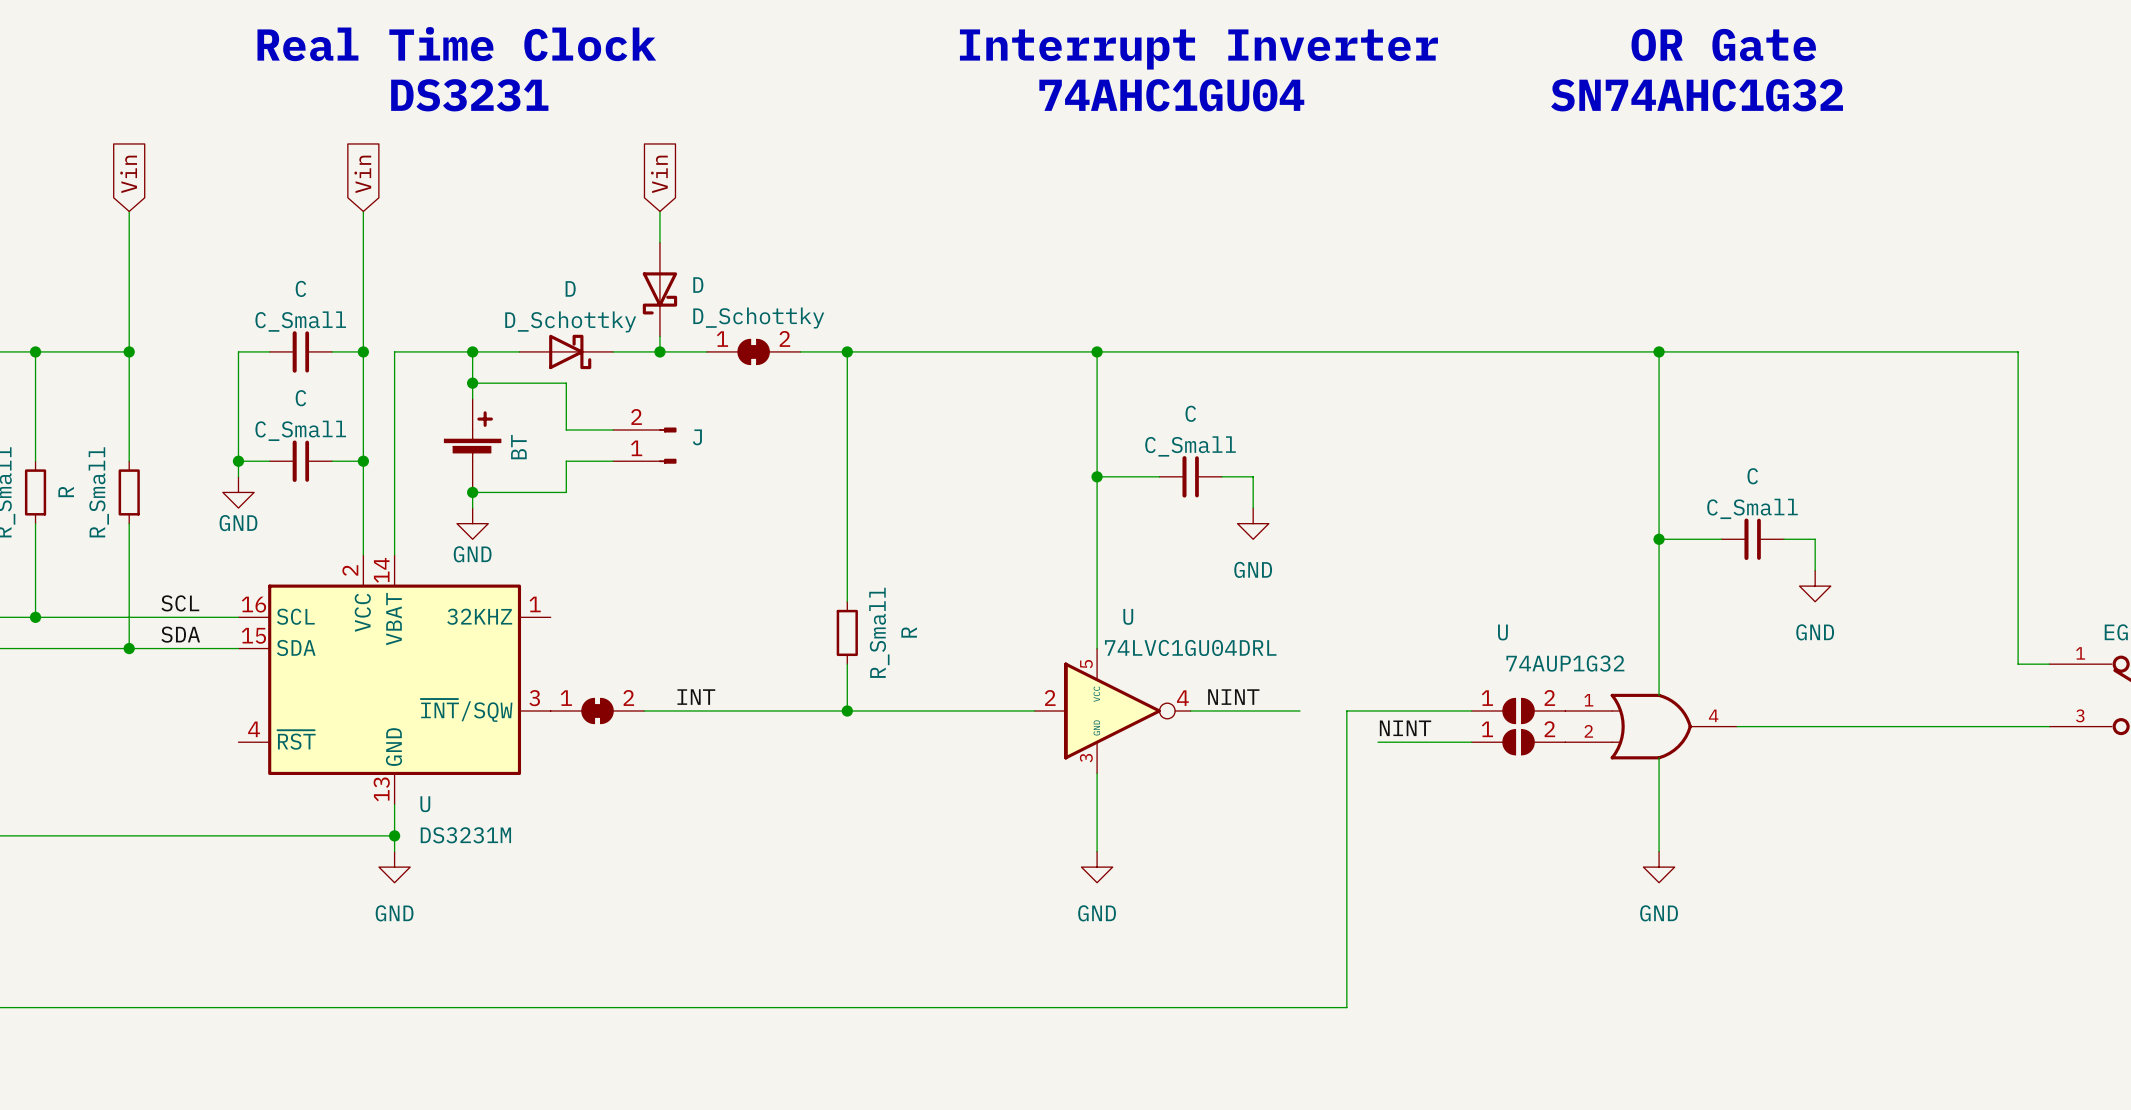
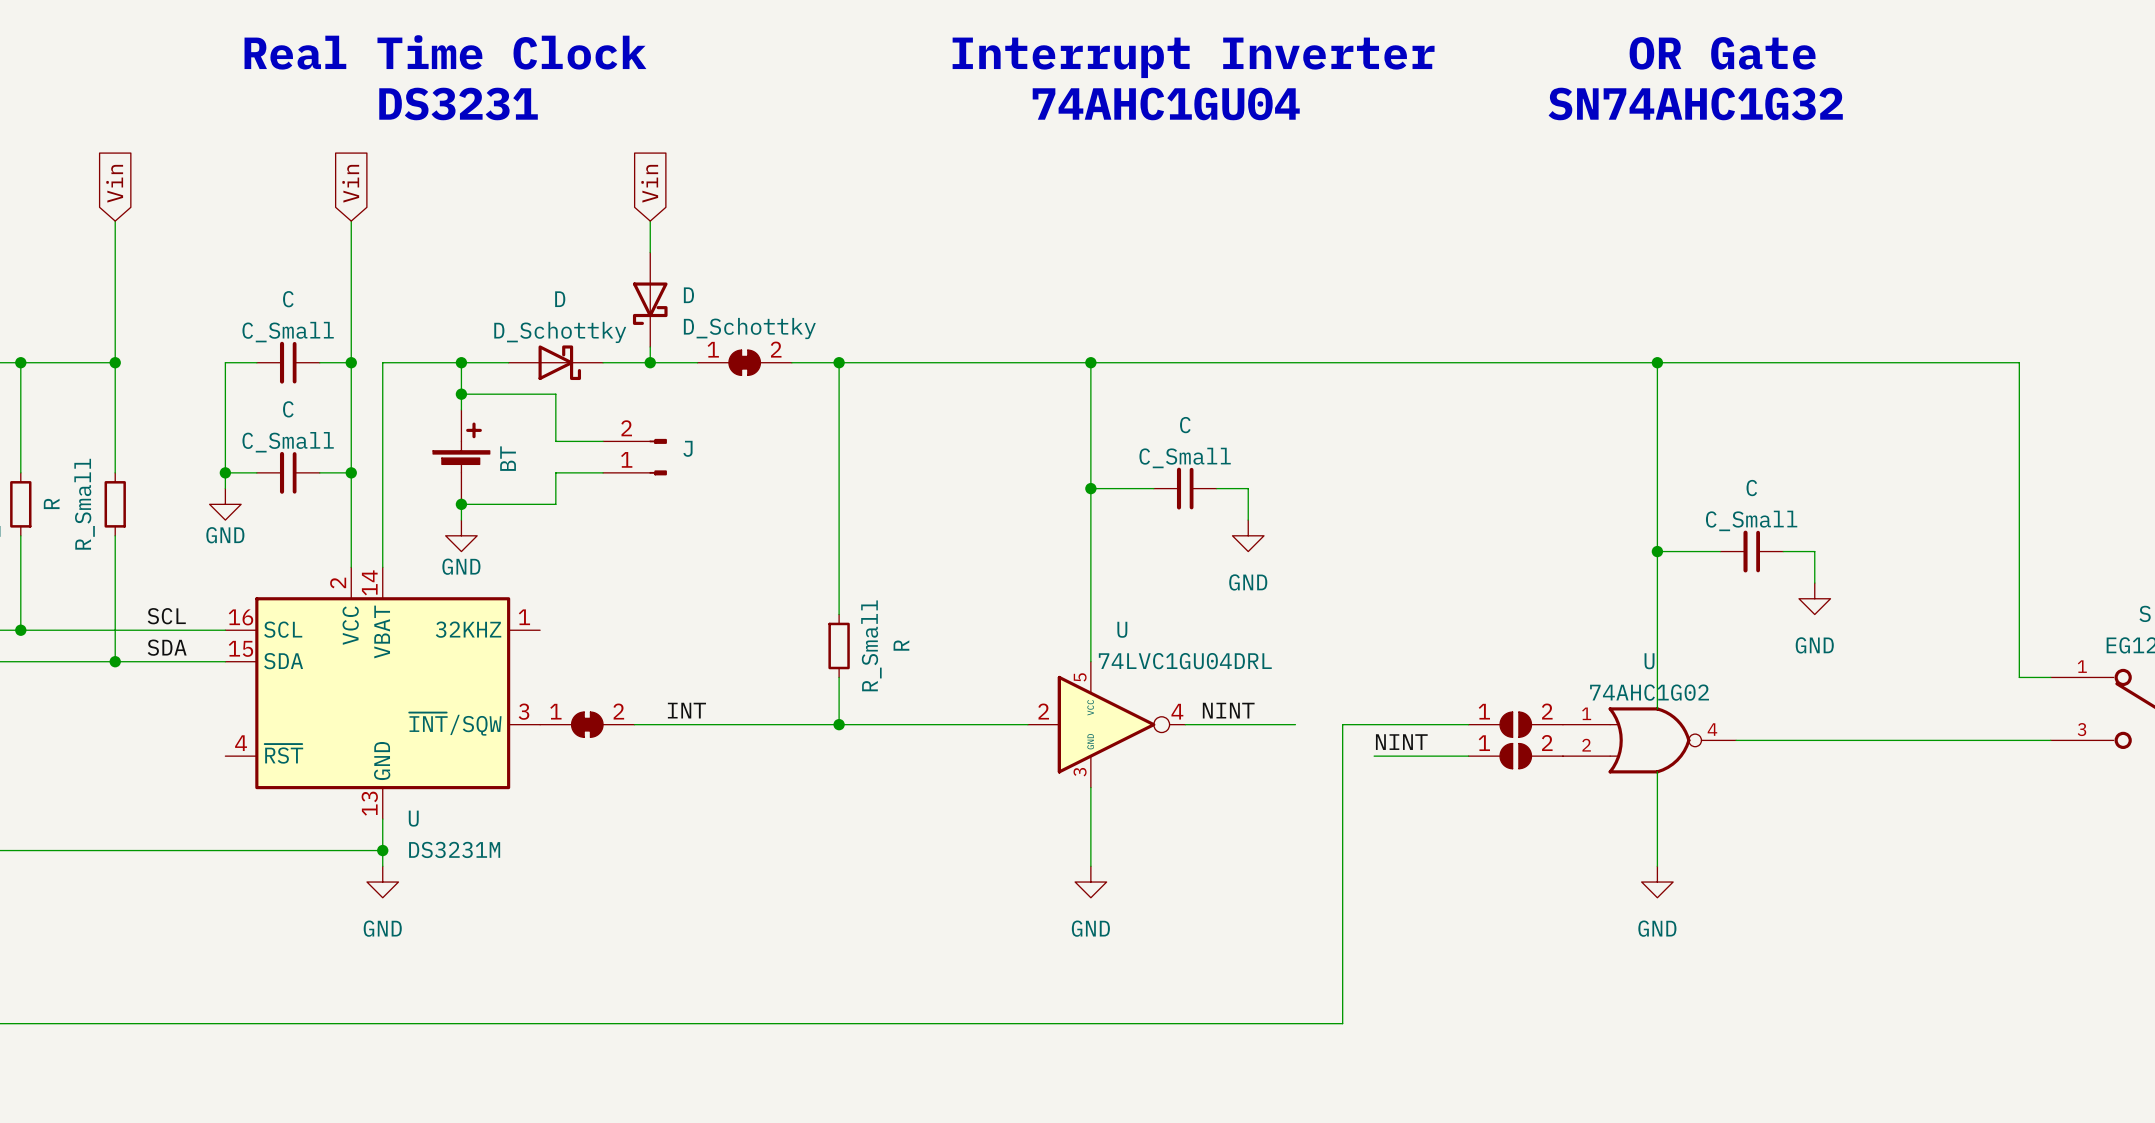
U name position: U (1502, 632) -> U (1649, 661)
U value: 74AUP1G32 (1565, 663) -> 74AHC1G02 (1649, 692)
U symbol: [1565, 693, 1738, 760] -> [1562, 707, 1737, 774]

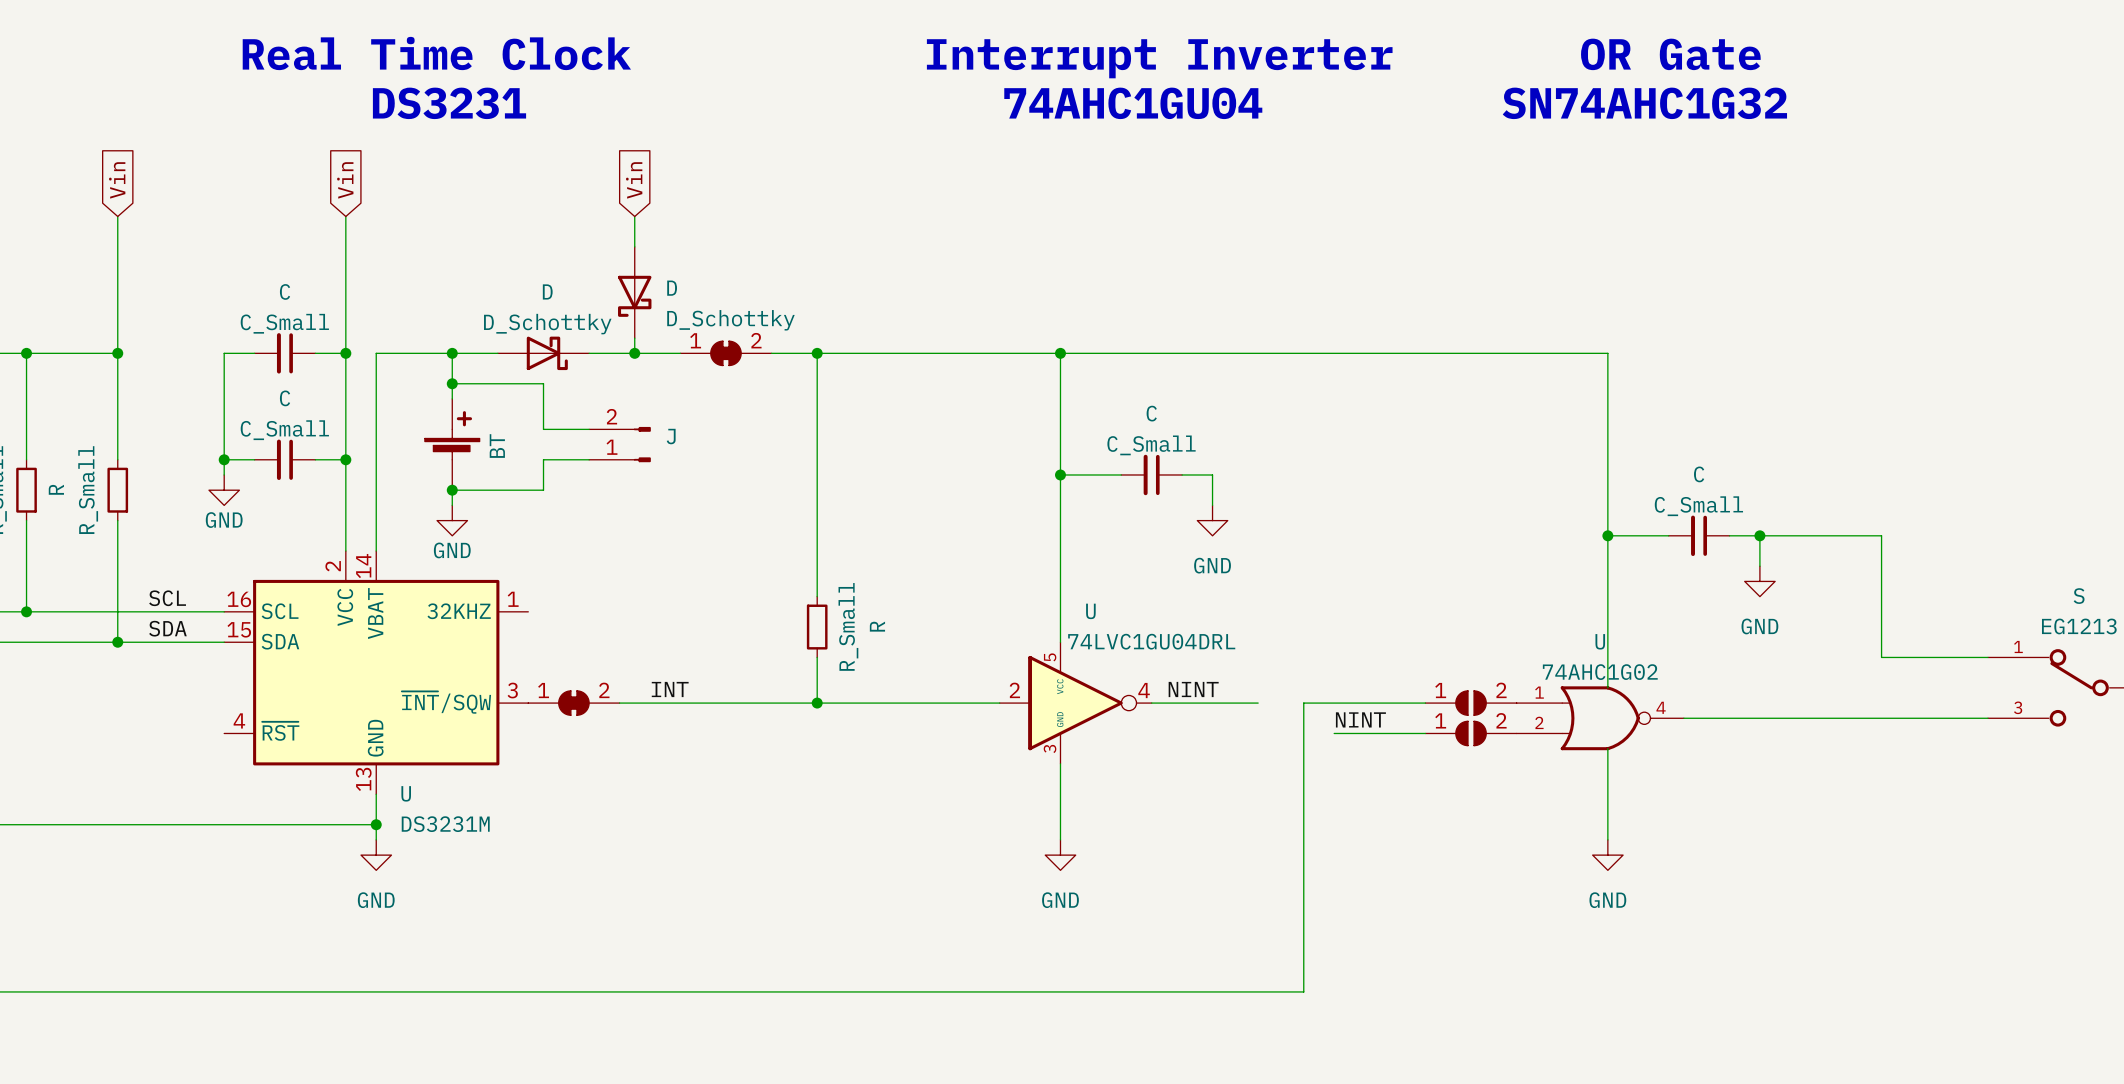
wire: (1657, 362) (2019, 362) (2019, 677) -> (1759, 535) (1881, 535) (1881, 657) (1957, 657)
junction: (1657, 362) -> none
junction: none -> (1759, 535)

